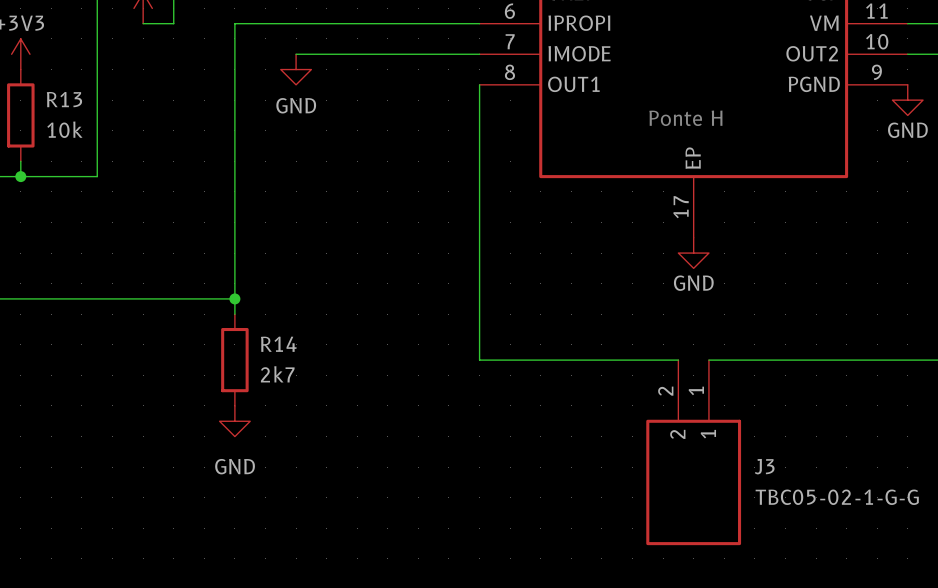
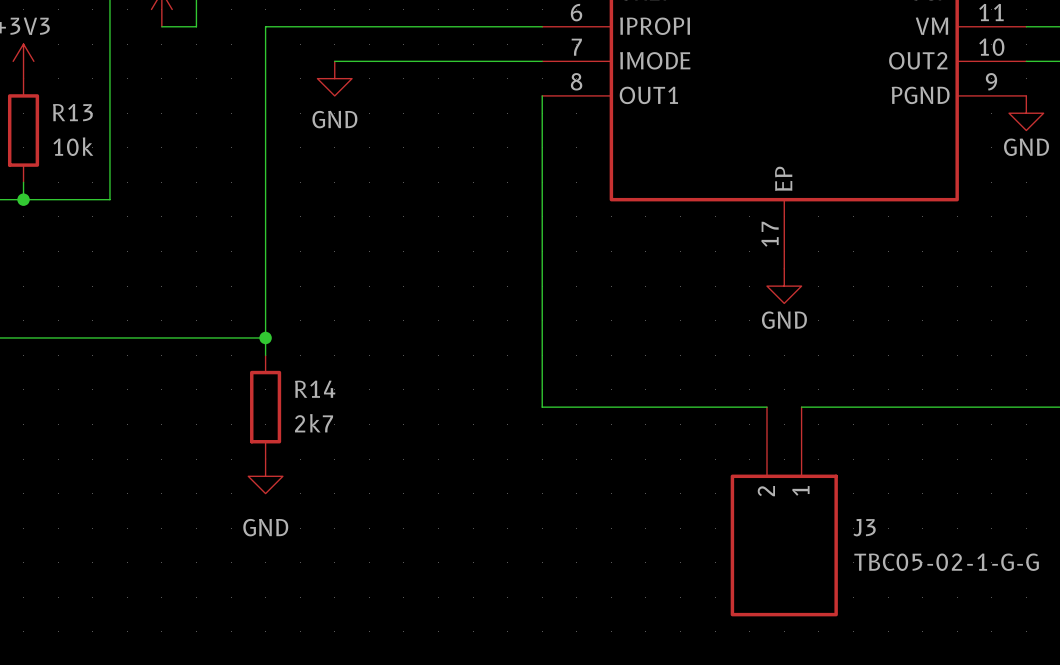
text: Ponte H (685, 118) -> none
J3 pin number: 1 (696, 390) -> none
J3 pin number: 2 (665, 391) -> none

